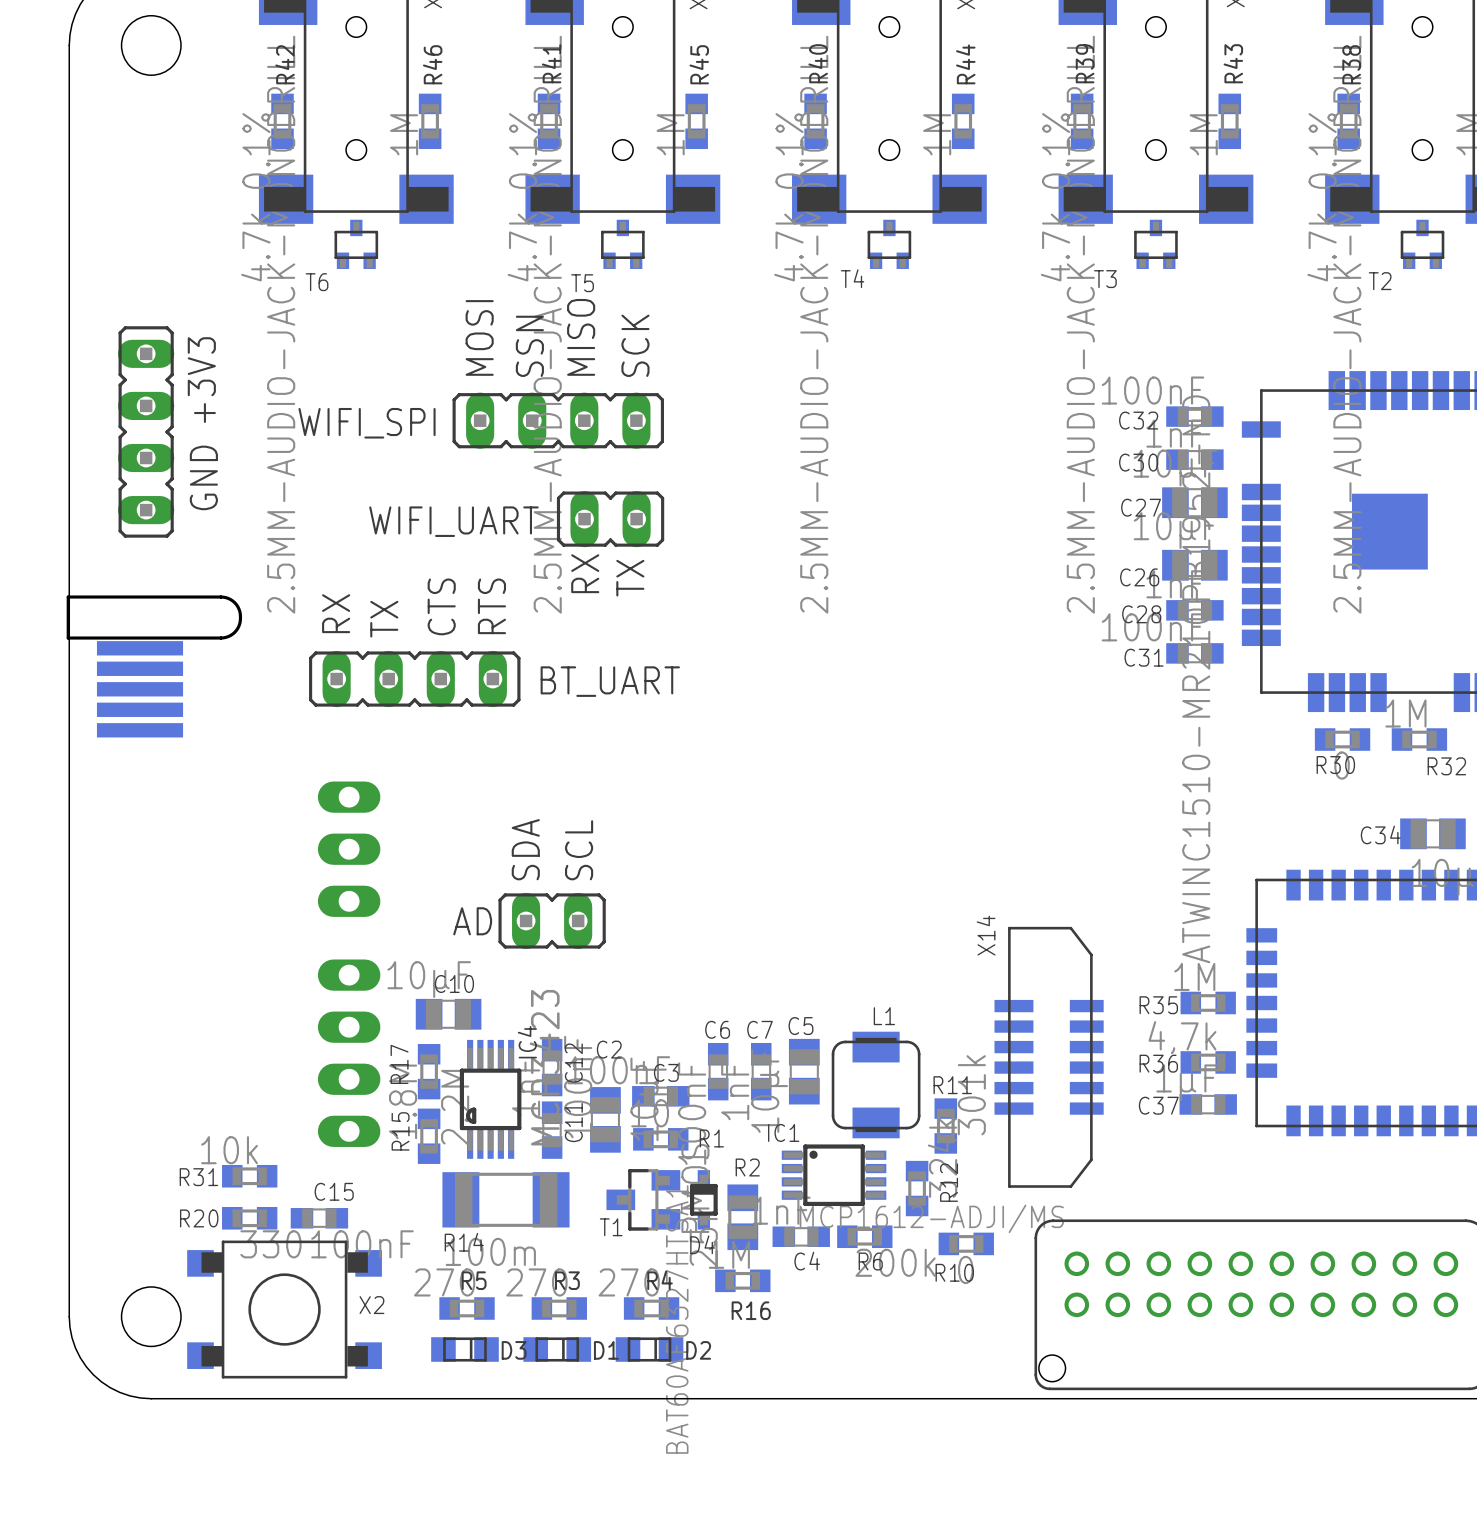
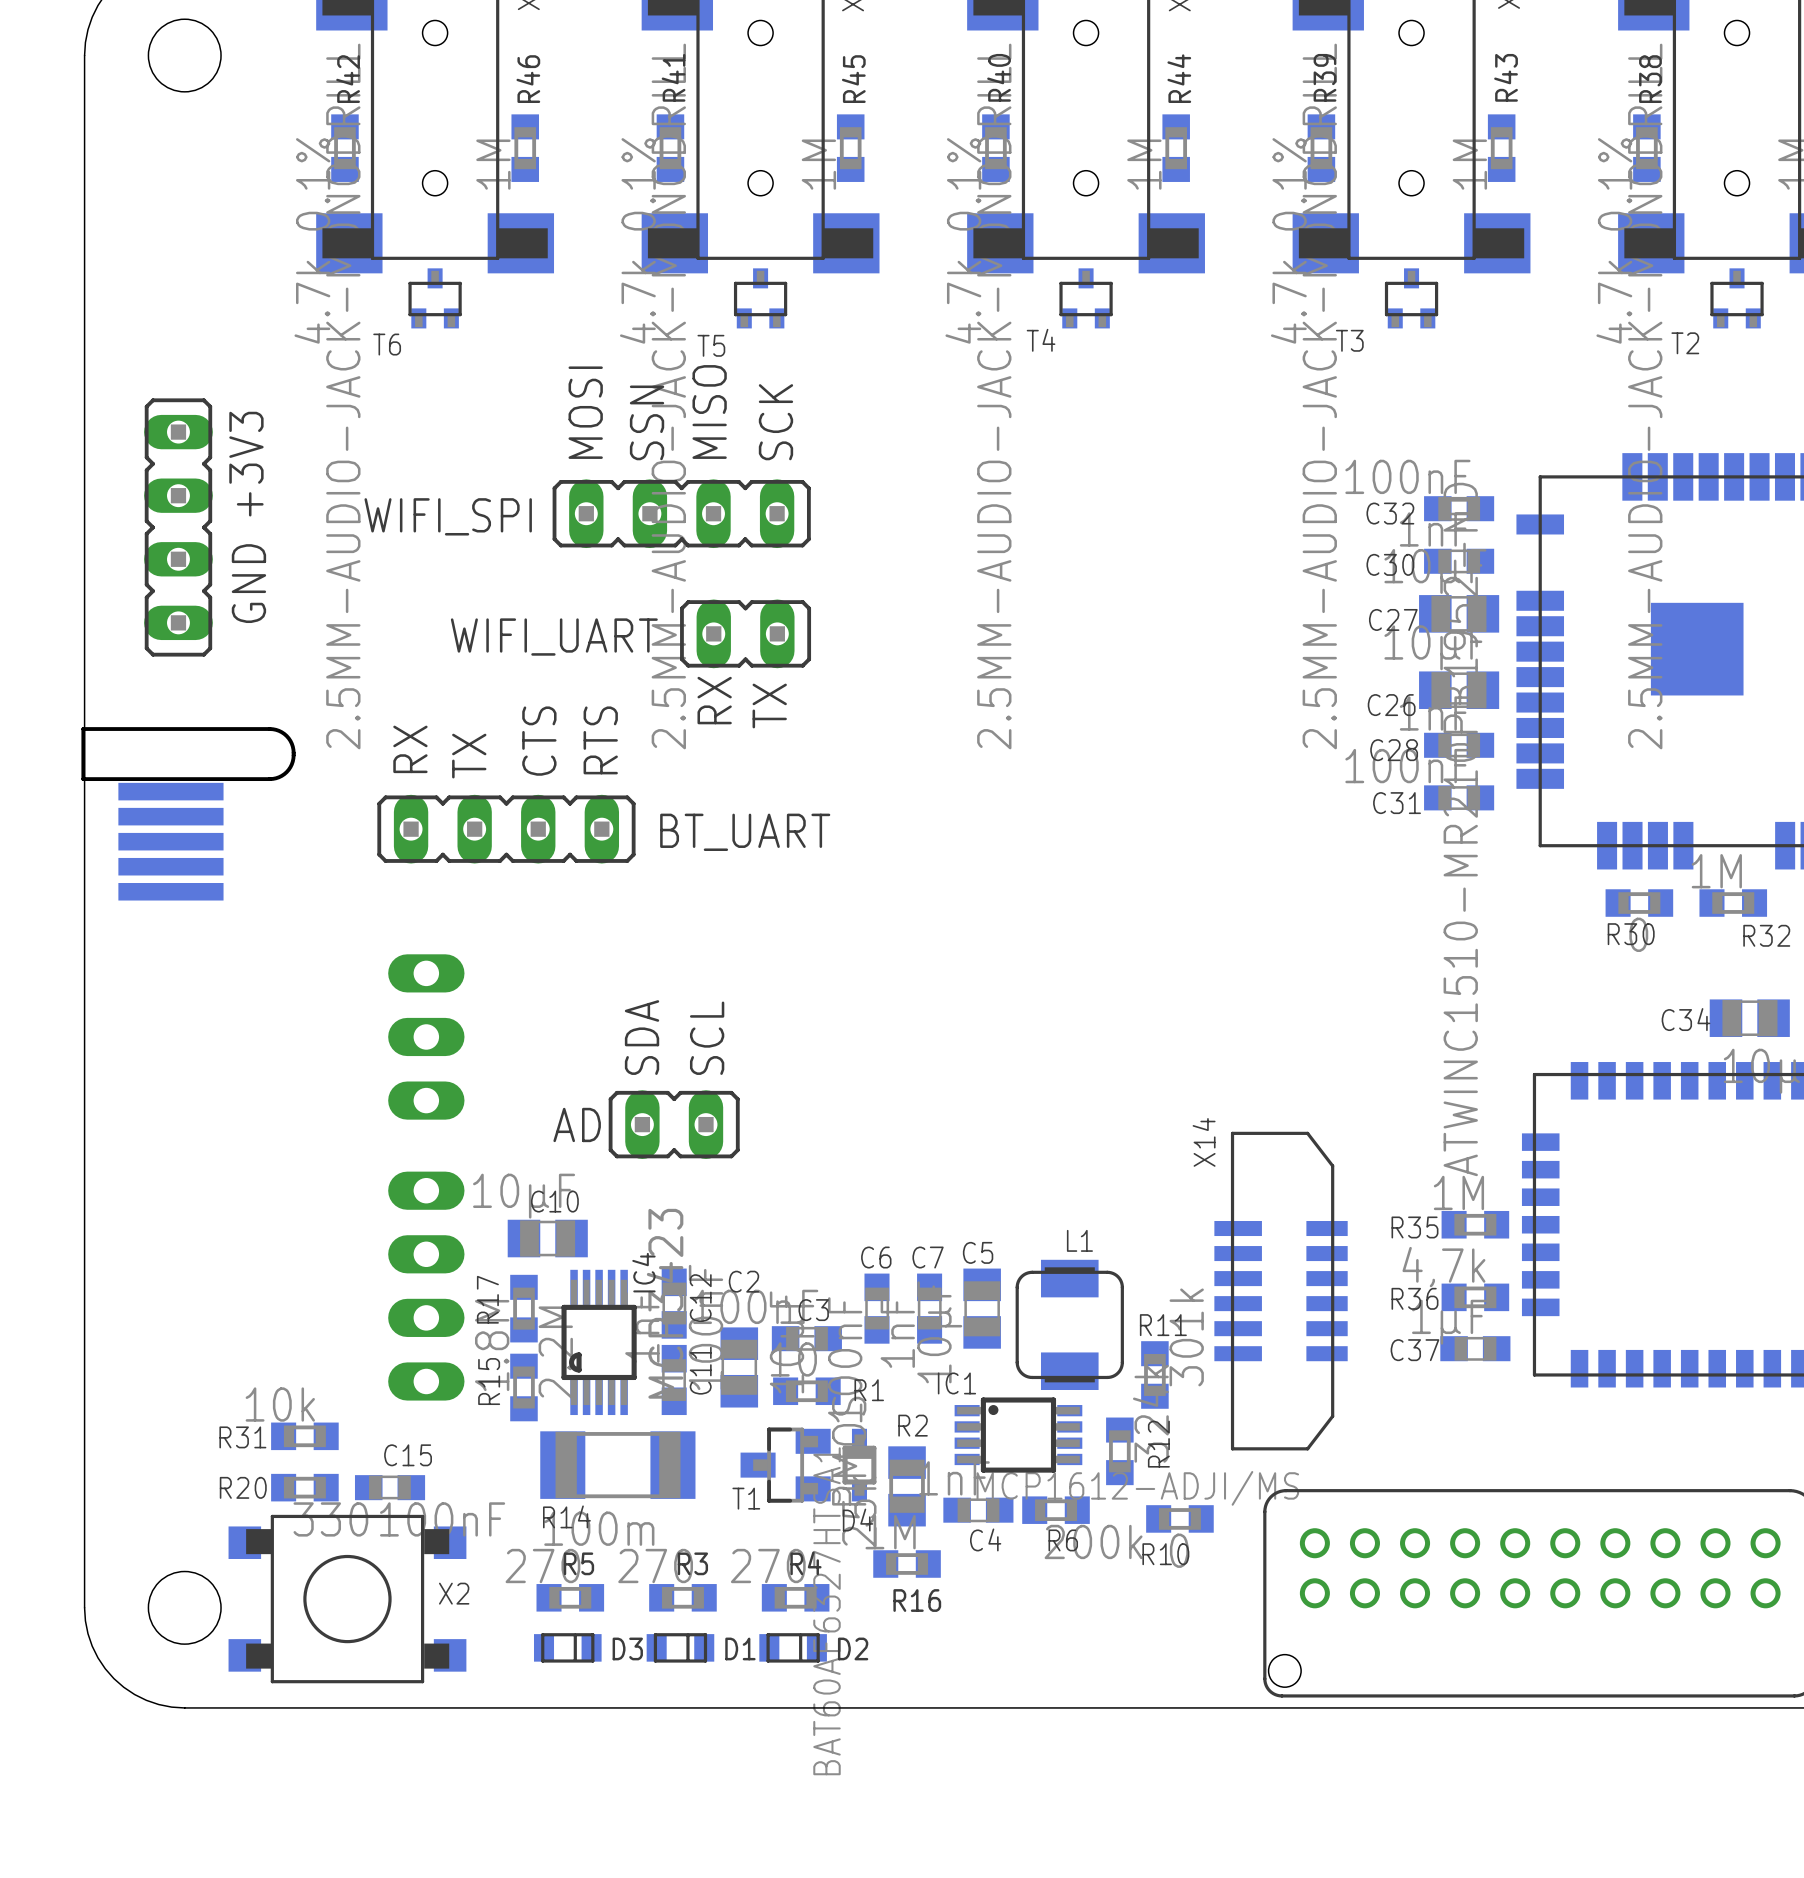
D4 footprint: [689, 1170, 718, 1230] -> [842, 1428, 877, 1502]
D3 footprint: [431, 1337, 499, 1362] -> [533, 1633, 602, 1663]
D1 footprint: [523, 1337, 592, 1362] -> [646, 1633, 715, 1663]
D2 footprint: [615, 1337, 684, 1362] -> [759, 1633, 827, 1663]

